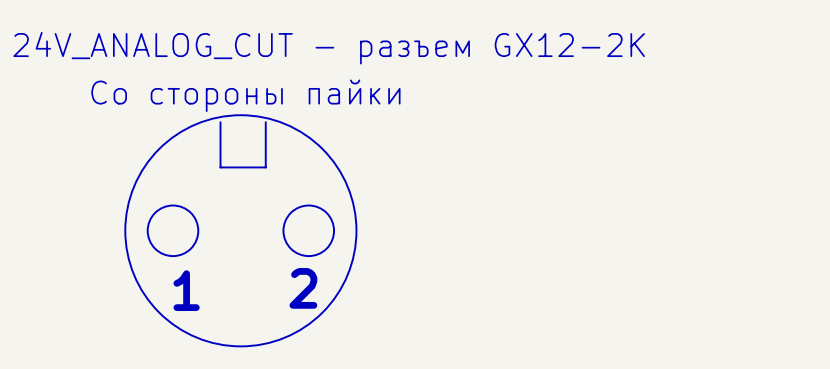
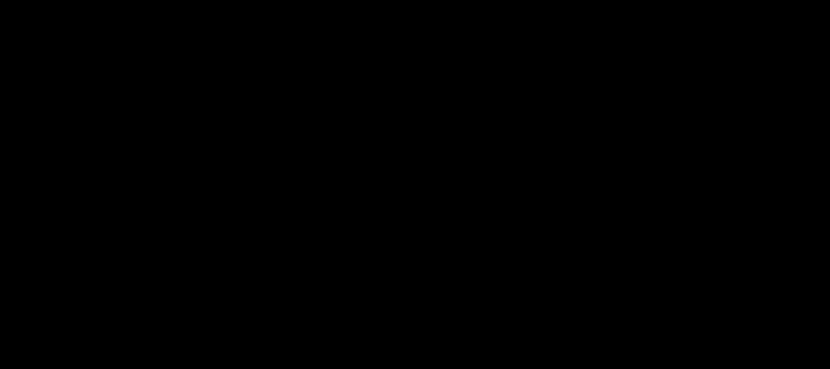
text: 24V_ANALOG_CUT - разъем GX12-2K (329, 48) -> none
text: Со стороны пайки (245, 95) -> none
drawing: [125, 115, 357, 347] -> none
line: (220, 122) (220, 167) (265, 167) (265, 122) -> none
text: 2 (303, 288) -> none
text: 1 (186, 290) -> none

